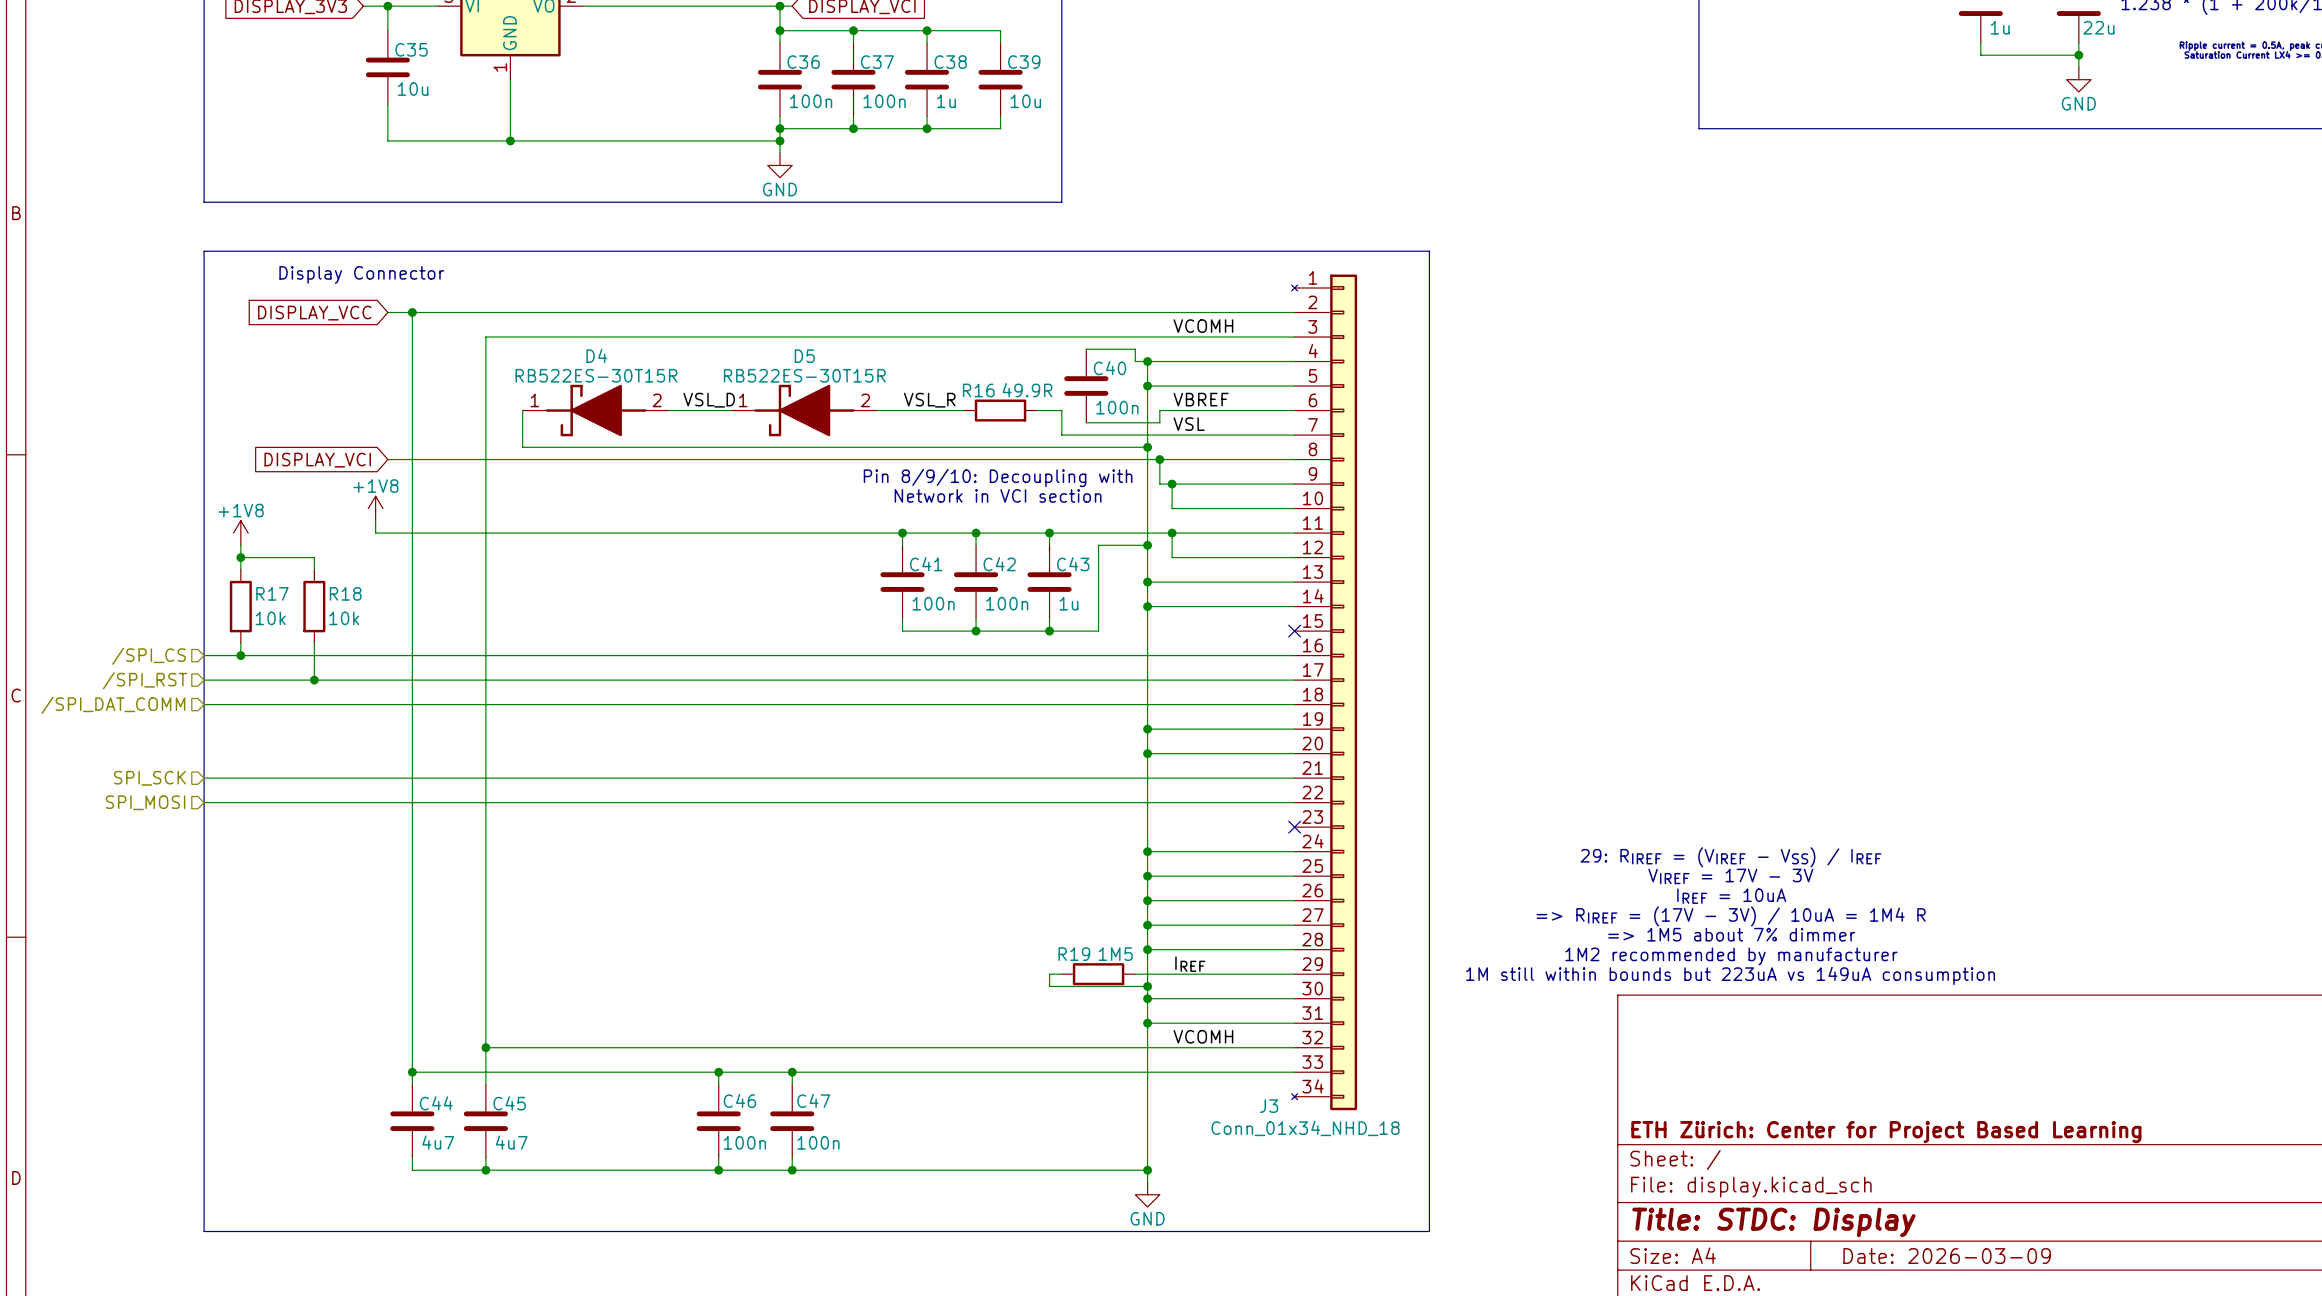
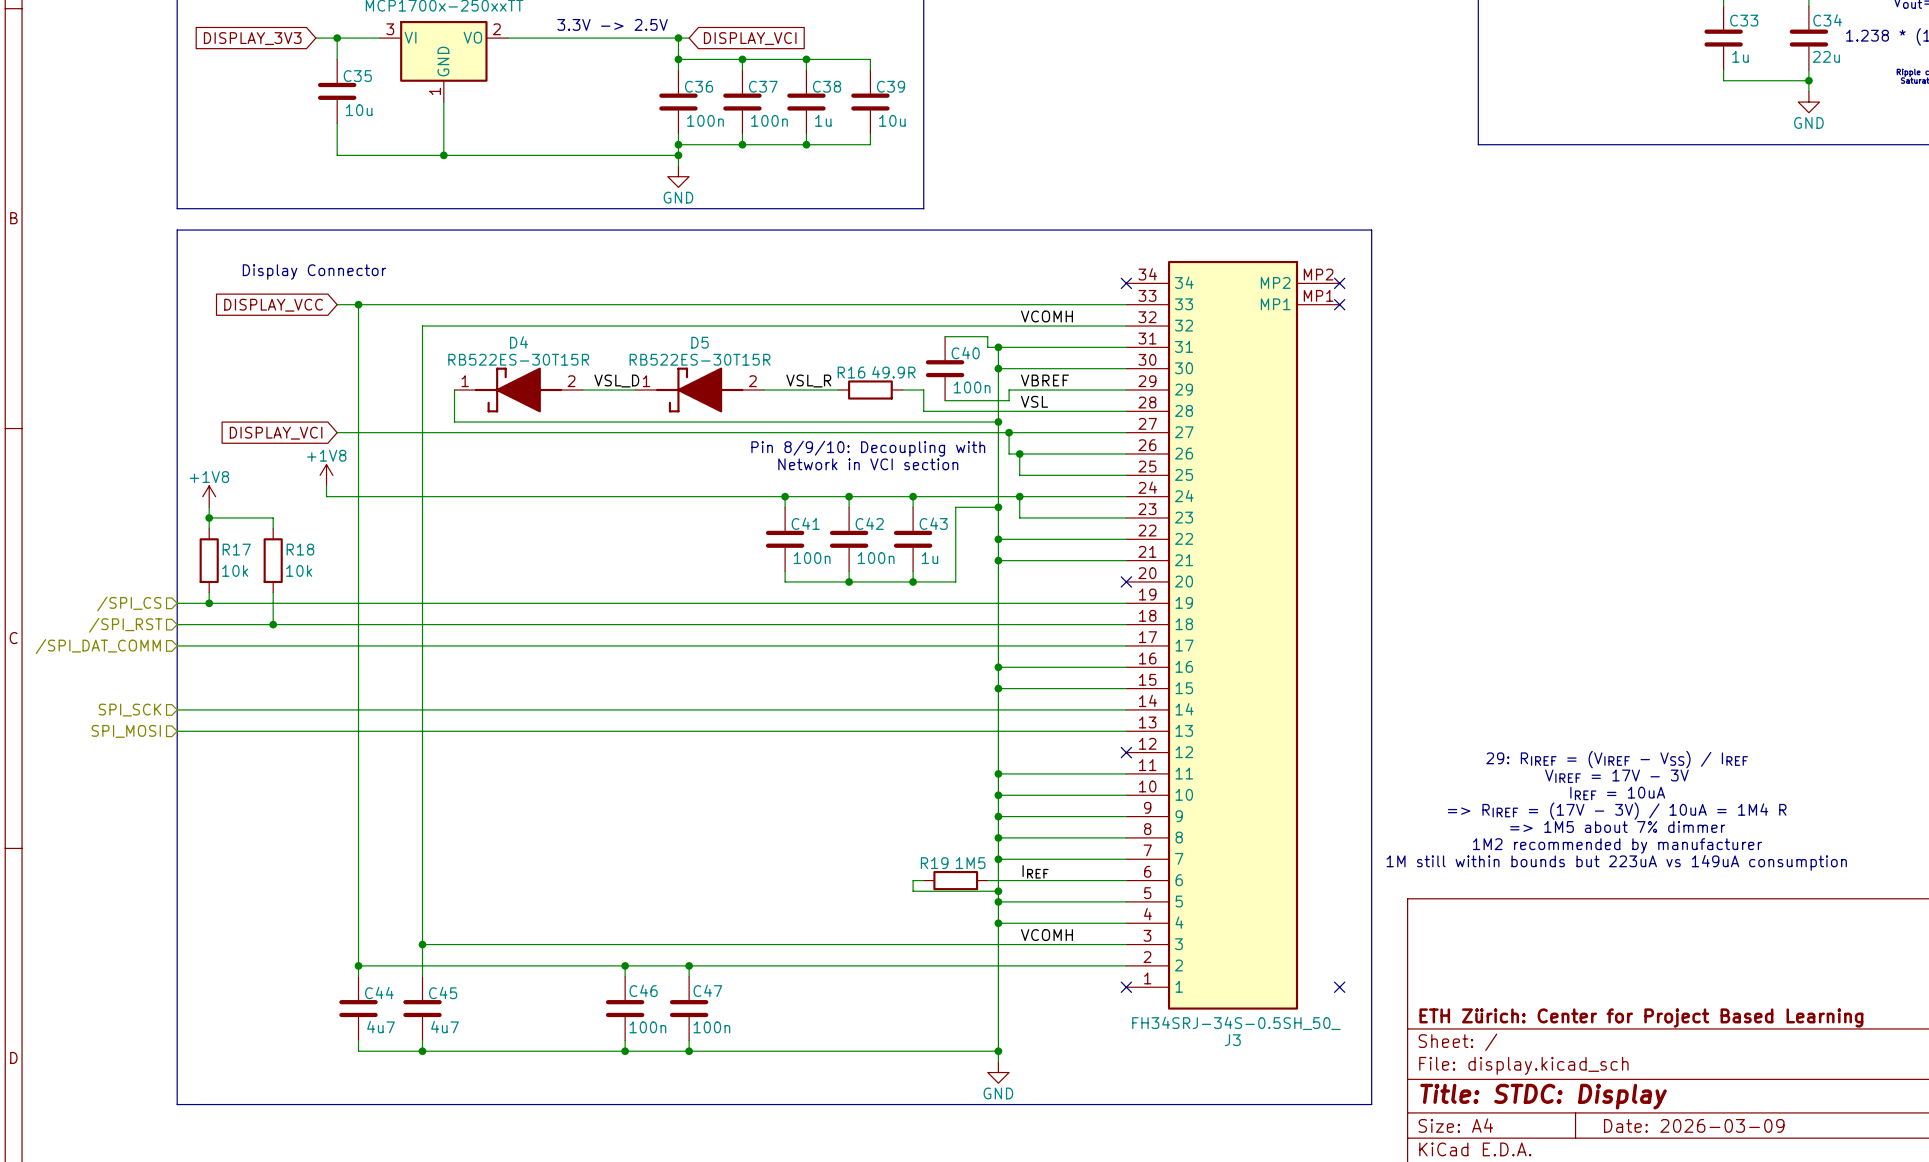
line: (204, 251) (1429, 251) (1429, 1231) -> (177, 251) (177, 230) (1371, 230) (1371, 1104) (1243, 1104)
J3 symbol: [1291, 274, 1358, 1111] -> [1126, 260, 1340, 1010]
no-connect mark: none -> (1126, 283)
no-connect mark: none -> (1339, 283)
no-connect mark: none -> (1339, 304)
text position: 29: RIREF = (VIREF - VSS) / IREF (1731, 857) -> 29: RIREF = (VIREF - VSS) / IREF (1617, 759)
text position: VIREF = 17V - 3V (1730, 876) -> VIREF = 17V - 3V (1616, 776)
text position: IREF = 10uA (1731, 896) -> IREF = 10uA (1617, 793)
text position: => RIREF = (17V - 3V) / 10uA = 1M4 R (1731, 916) -> => RIREF = (17V - 3V) / 10uA = 1M4 R (1617, 811)
text position: => 1M5 about 7% dimmer (1731, 934) -> => 1M5 about 7% dimmer (1617, 827)
text position: 1M2 recommended by manufacturer (1731, 956) -> 1M2 recommended by manufacturer (1617, 845)
text position: 1M still within bounds but 223uA vs 149uA consumption (1730, 975) -> 1M still within bounds but 223uA vs 149uA consumption (1616, 862)
no-connect mark: none -> (1126, 987)
no-connect mark: none -> (1339, 987)
J3 name position: J3 (1269, 1106) -> J3 (1232, 1040)
J3 value: Conn_01x34_NHD_18 (1305, 1128) -> FH34SRJ-34S-0.5SH_50_ (1236, 1023)

